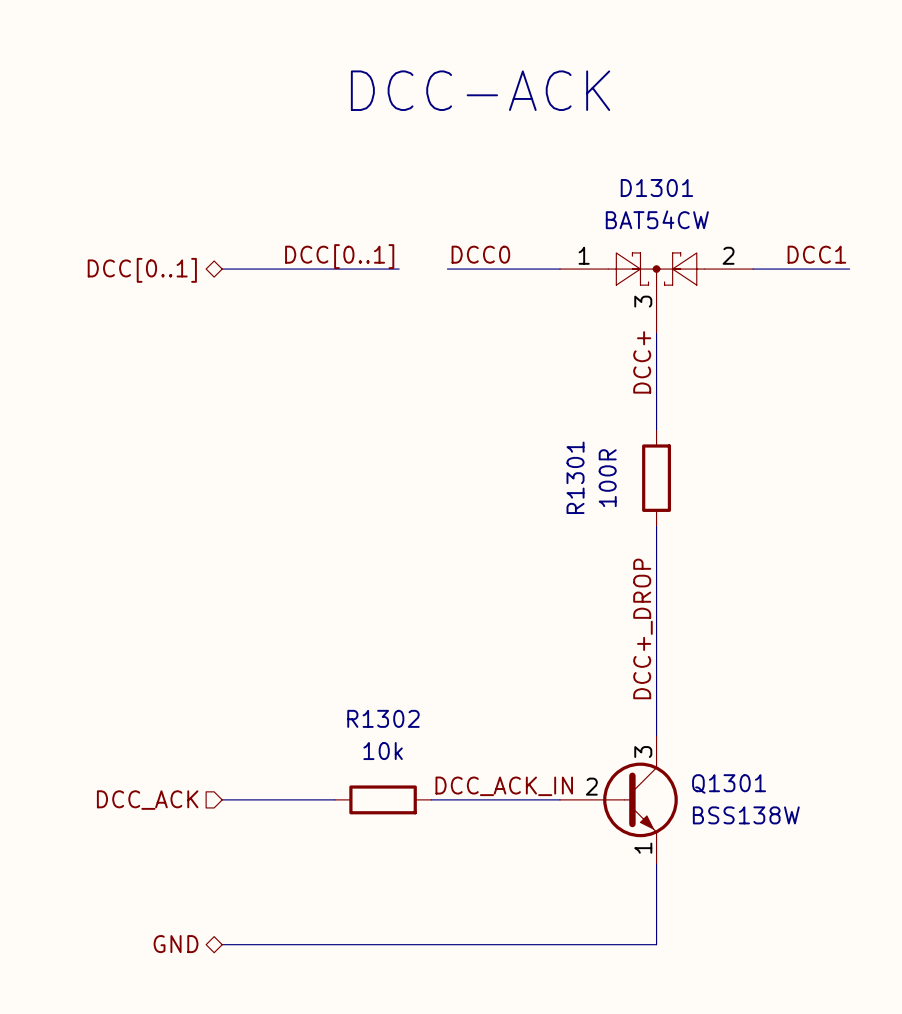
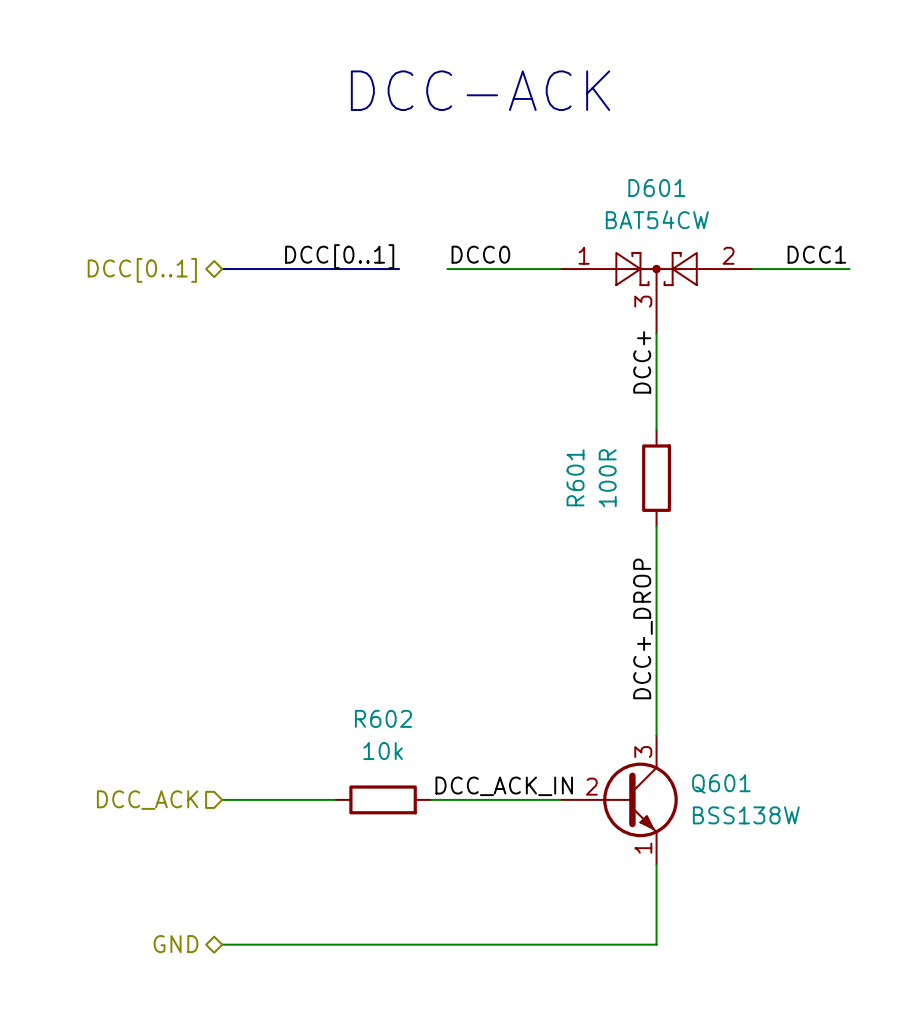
D1301 name: D1301 (656, 188) -> D601 (656, 188)
R1301 name: R1301 (575, 477) -> R601 (575, 477)
R1302 name: R1302 (383, 718) -> R602 (383, 718)
Q1301 name: Q1301 (729, 783) -> Q601 (721, 783)

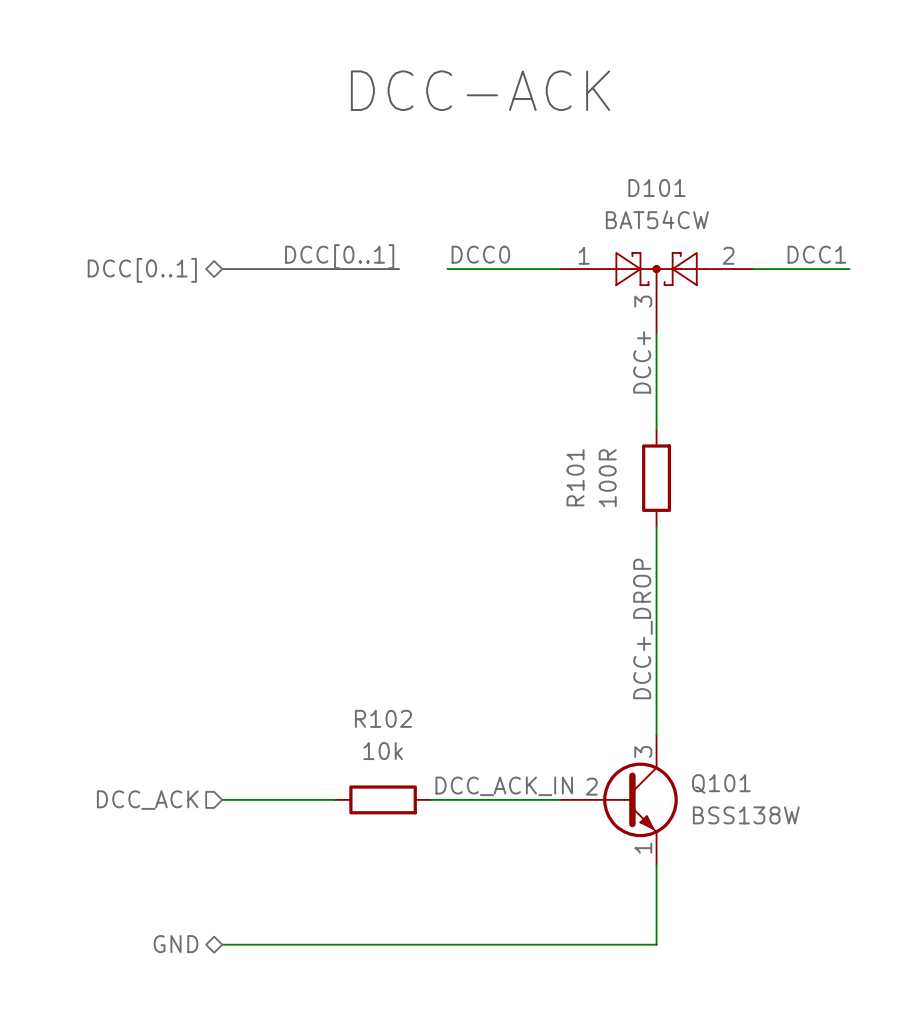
D601 name: D601 (656, 188) -> D101 (656, 188)
R601 name: R601 (575, 477) -> R101 (575, 477)
R602 name: R602 (383, 718) -> R102 (383, 718)
Q601 name: Q601 (721, 783) -> Q101 (721, 783)

